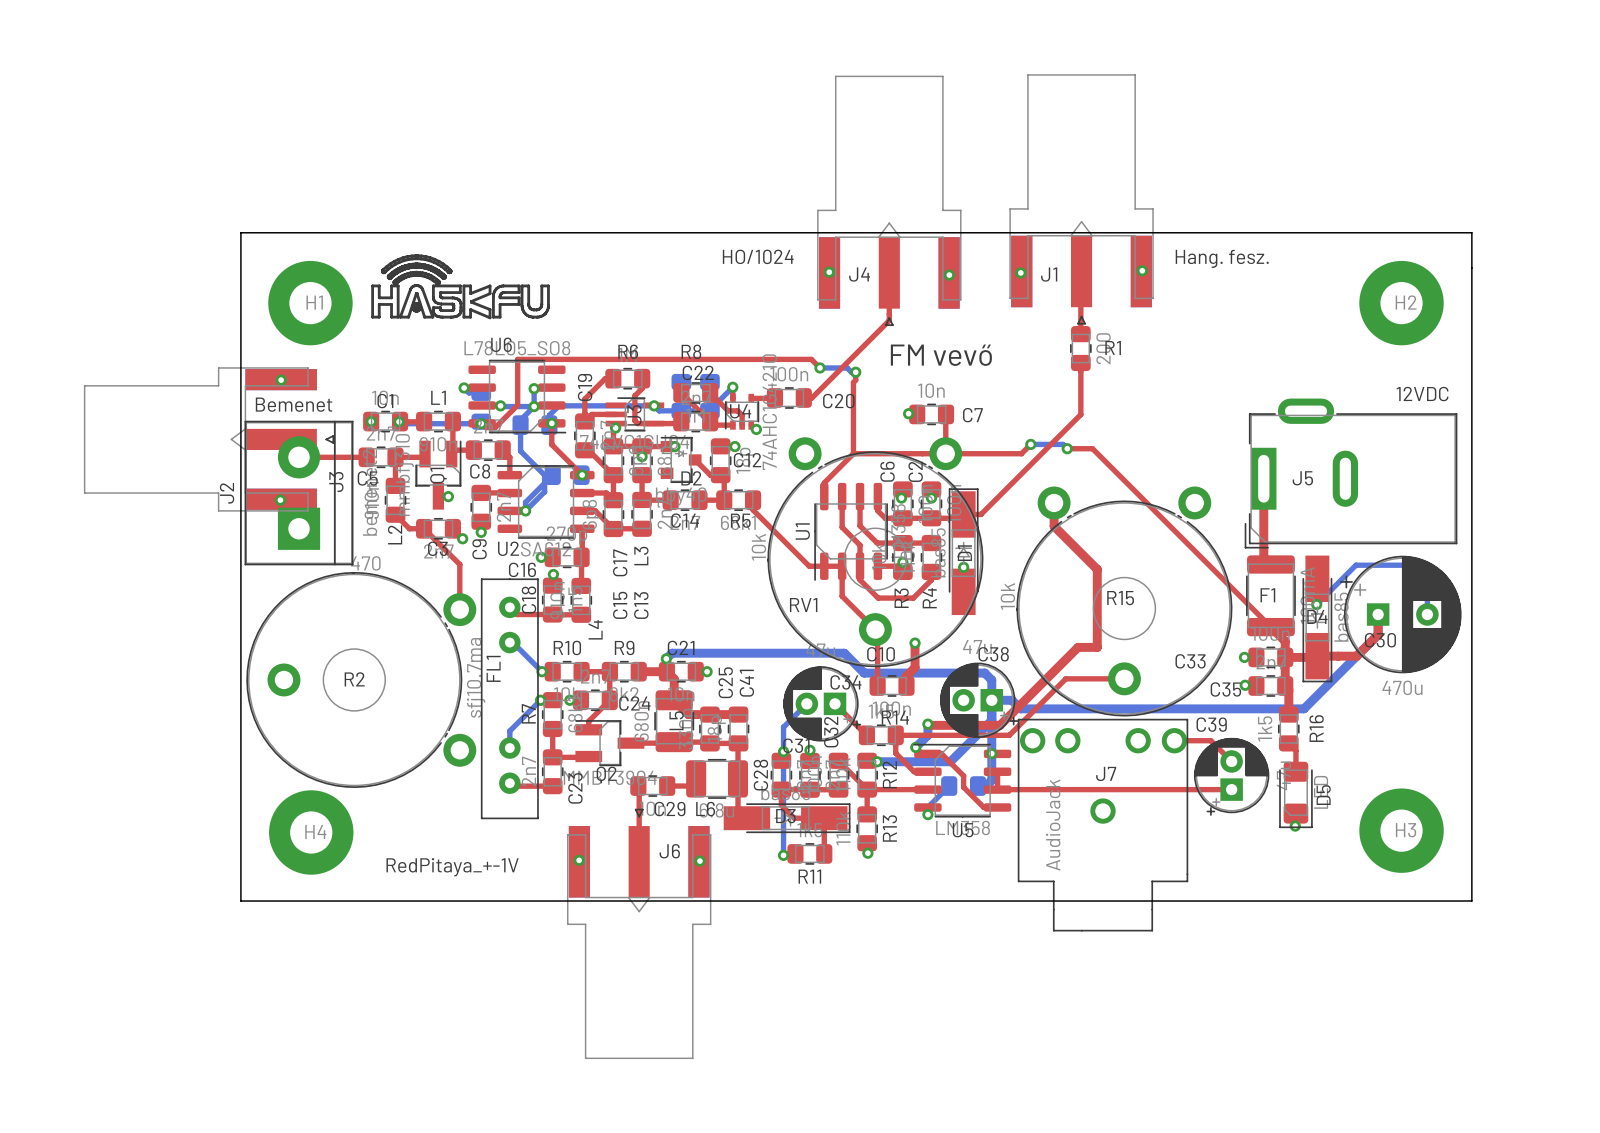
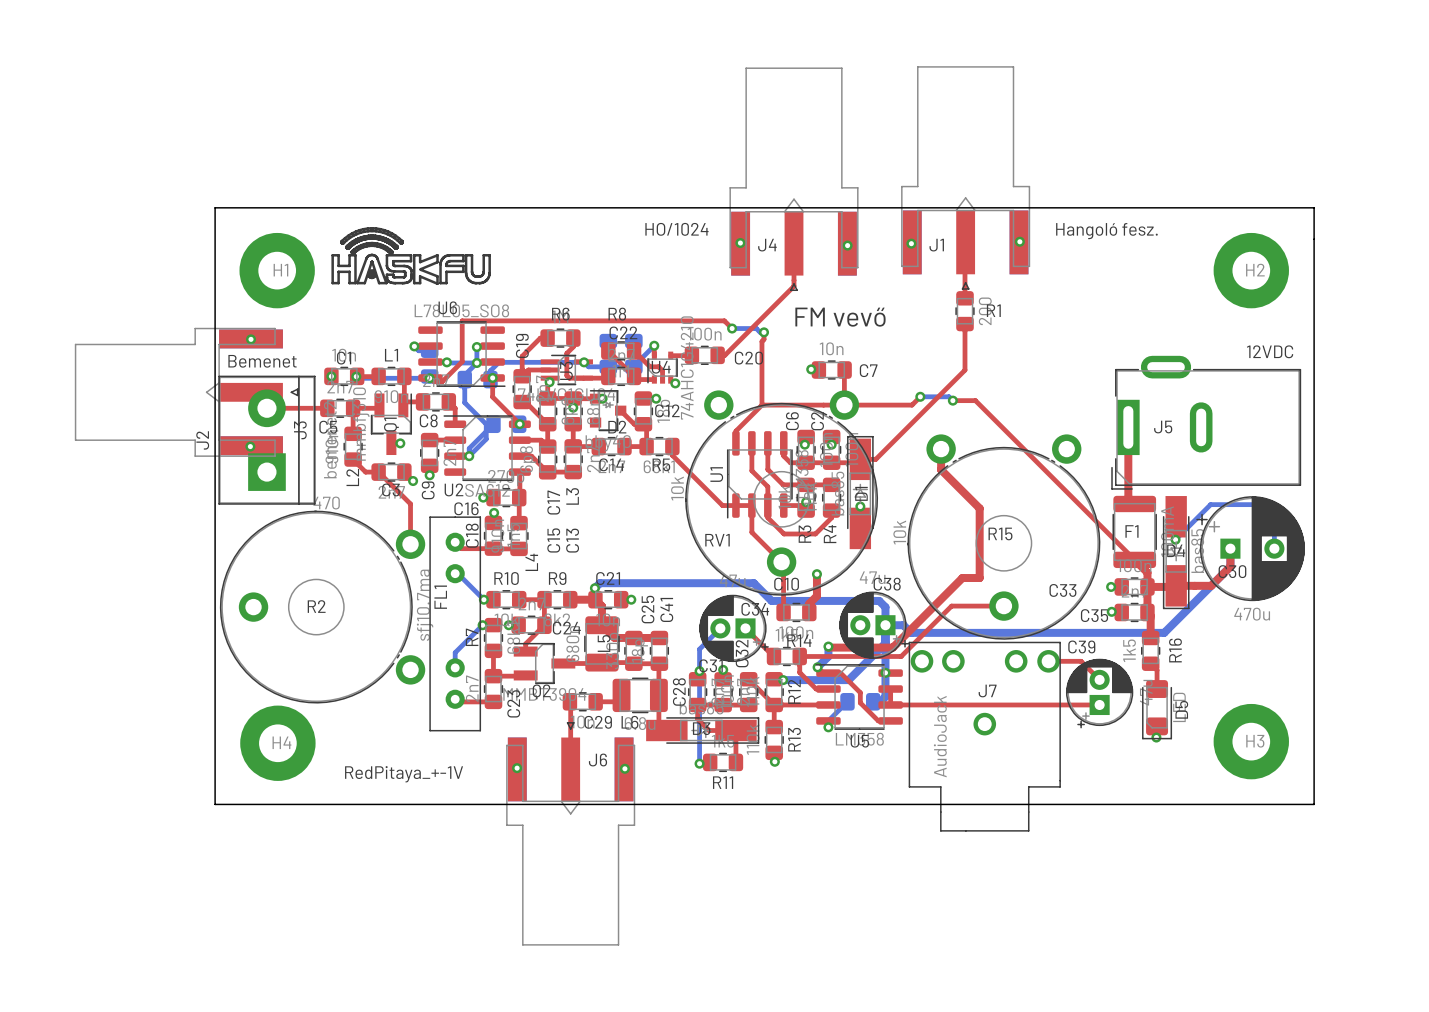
J1 value: Hang. fesz. (1222, 258) -> Hangoló fesz. (1106, 231)

